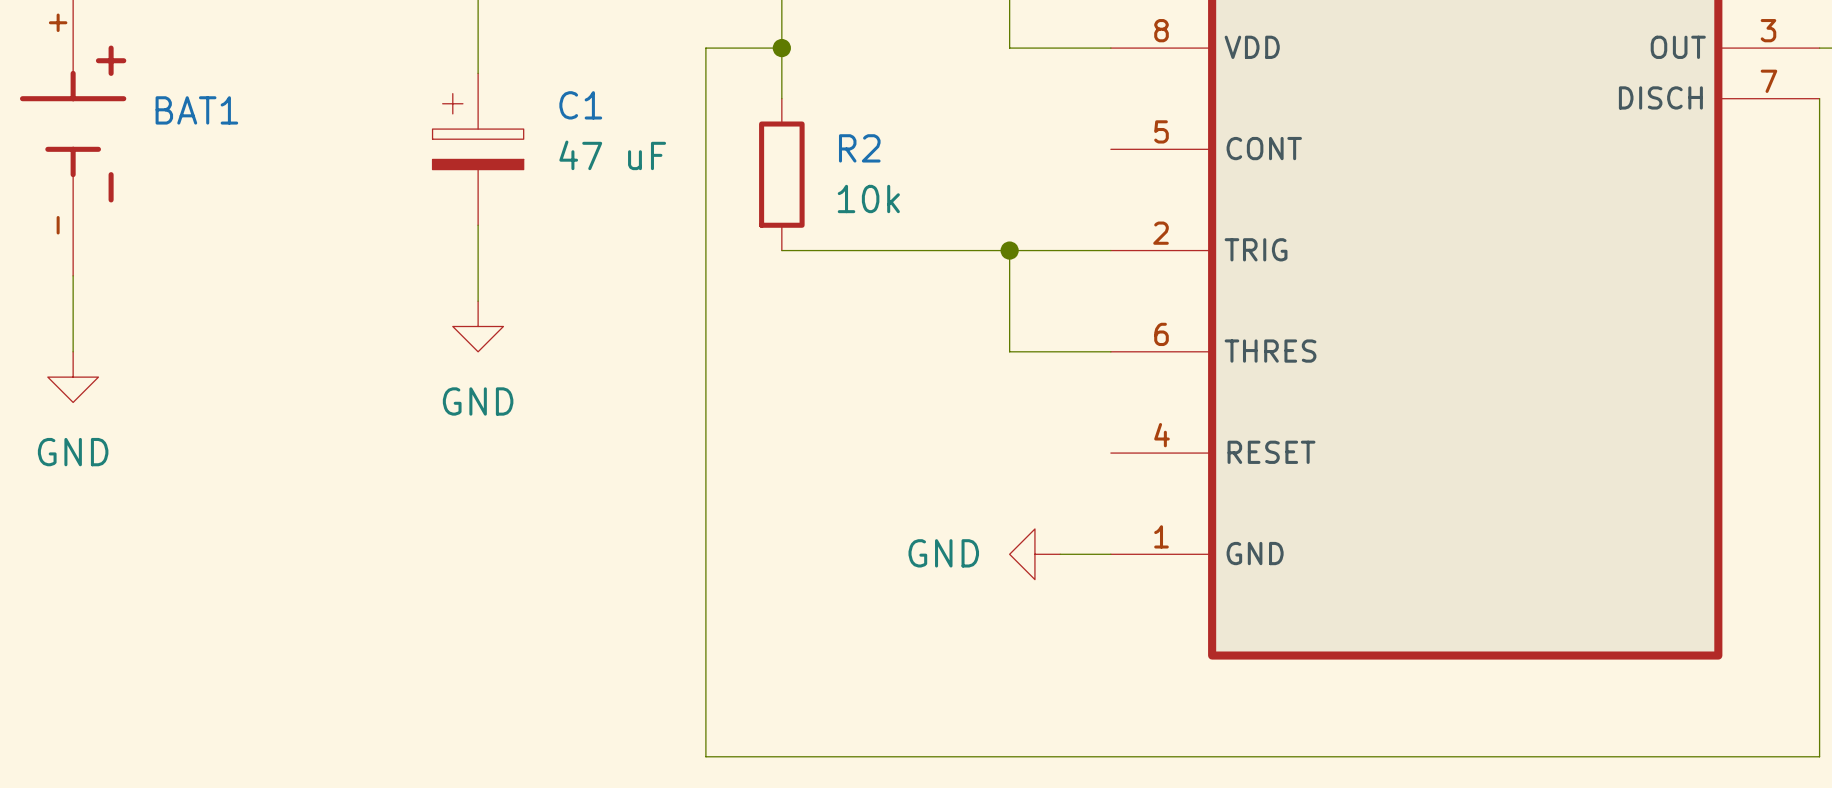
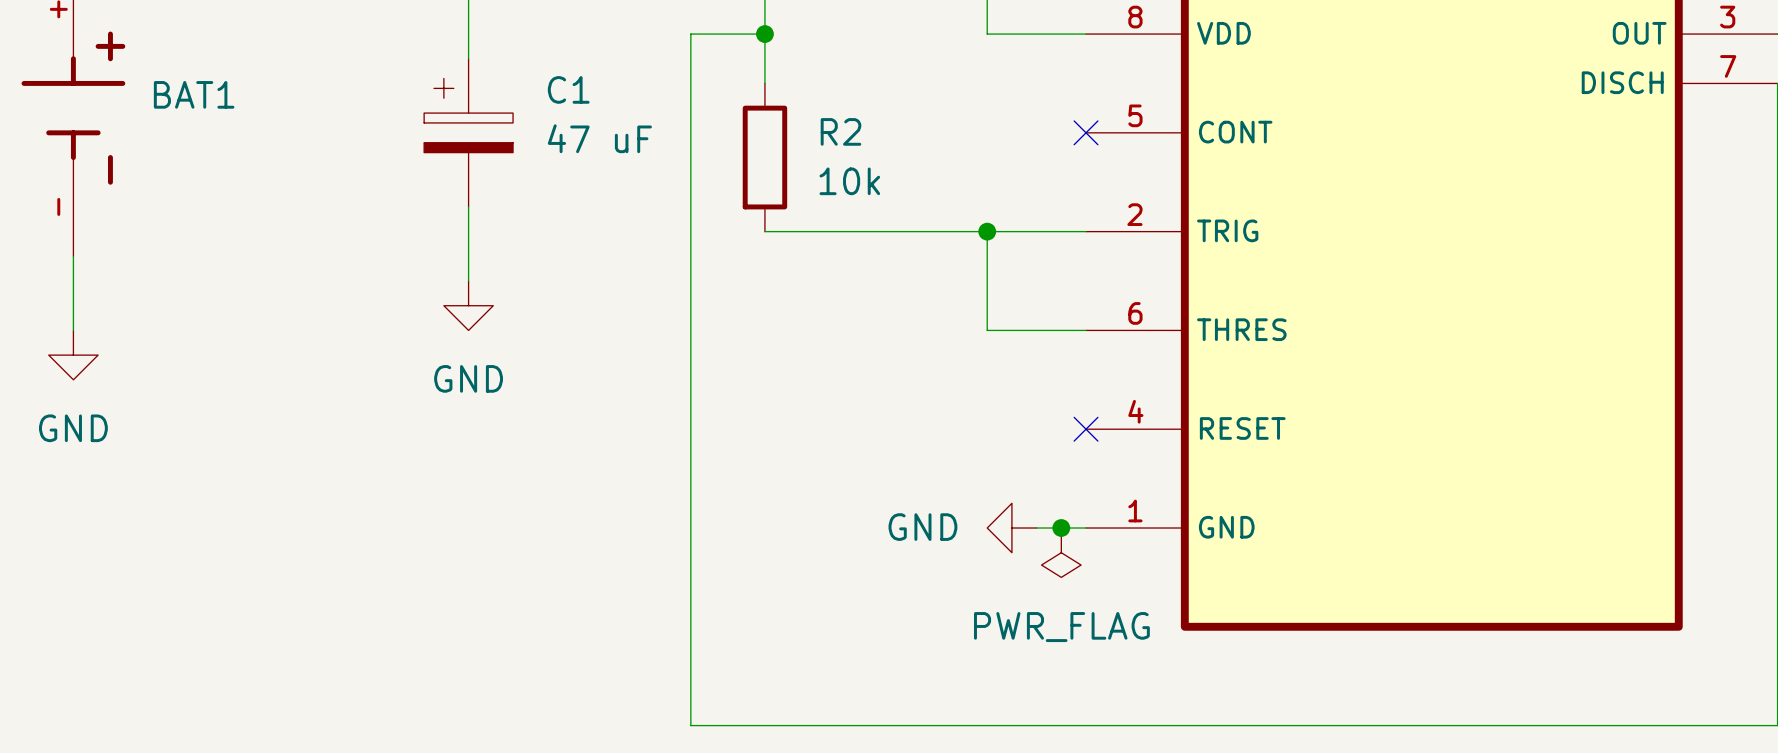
no-connect mark: none -> (1086, 132)
no-connect mark: none -> (1086, 429)
junction: none -> (1061, 528)
power symbol: none -> PWR_FLAG (1061, 552)

